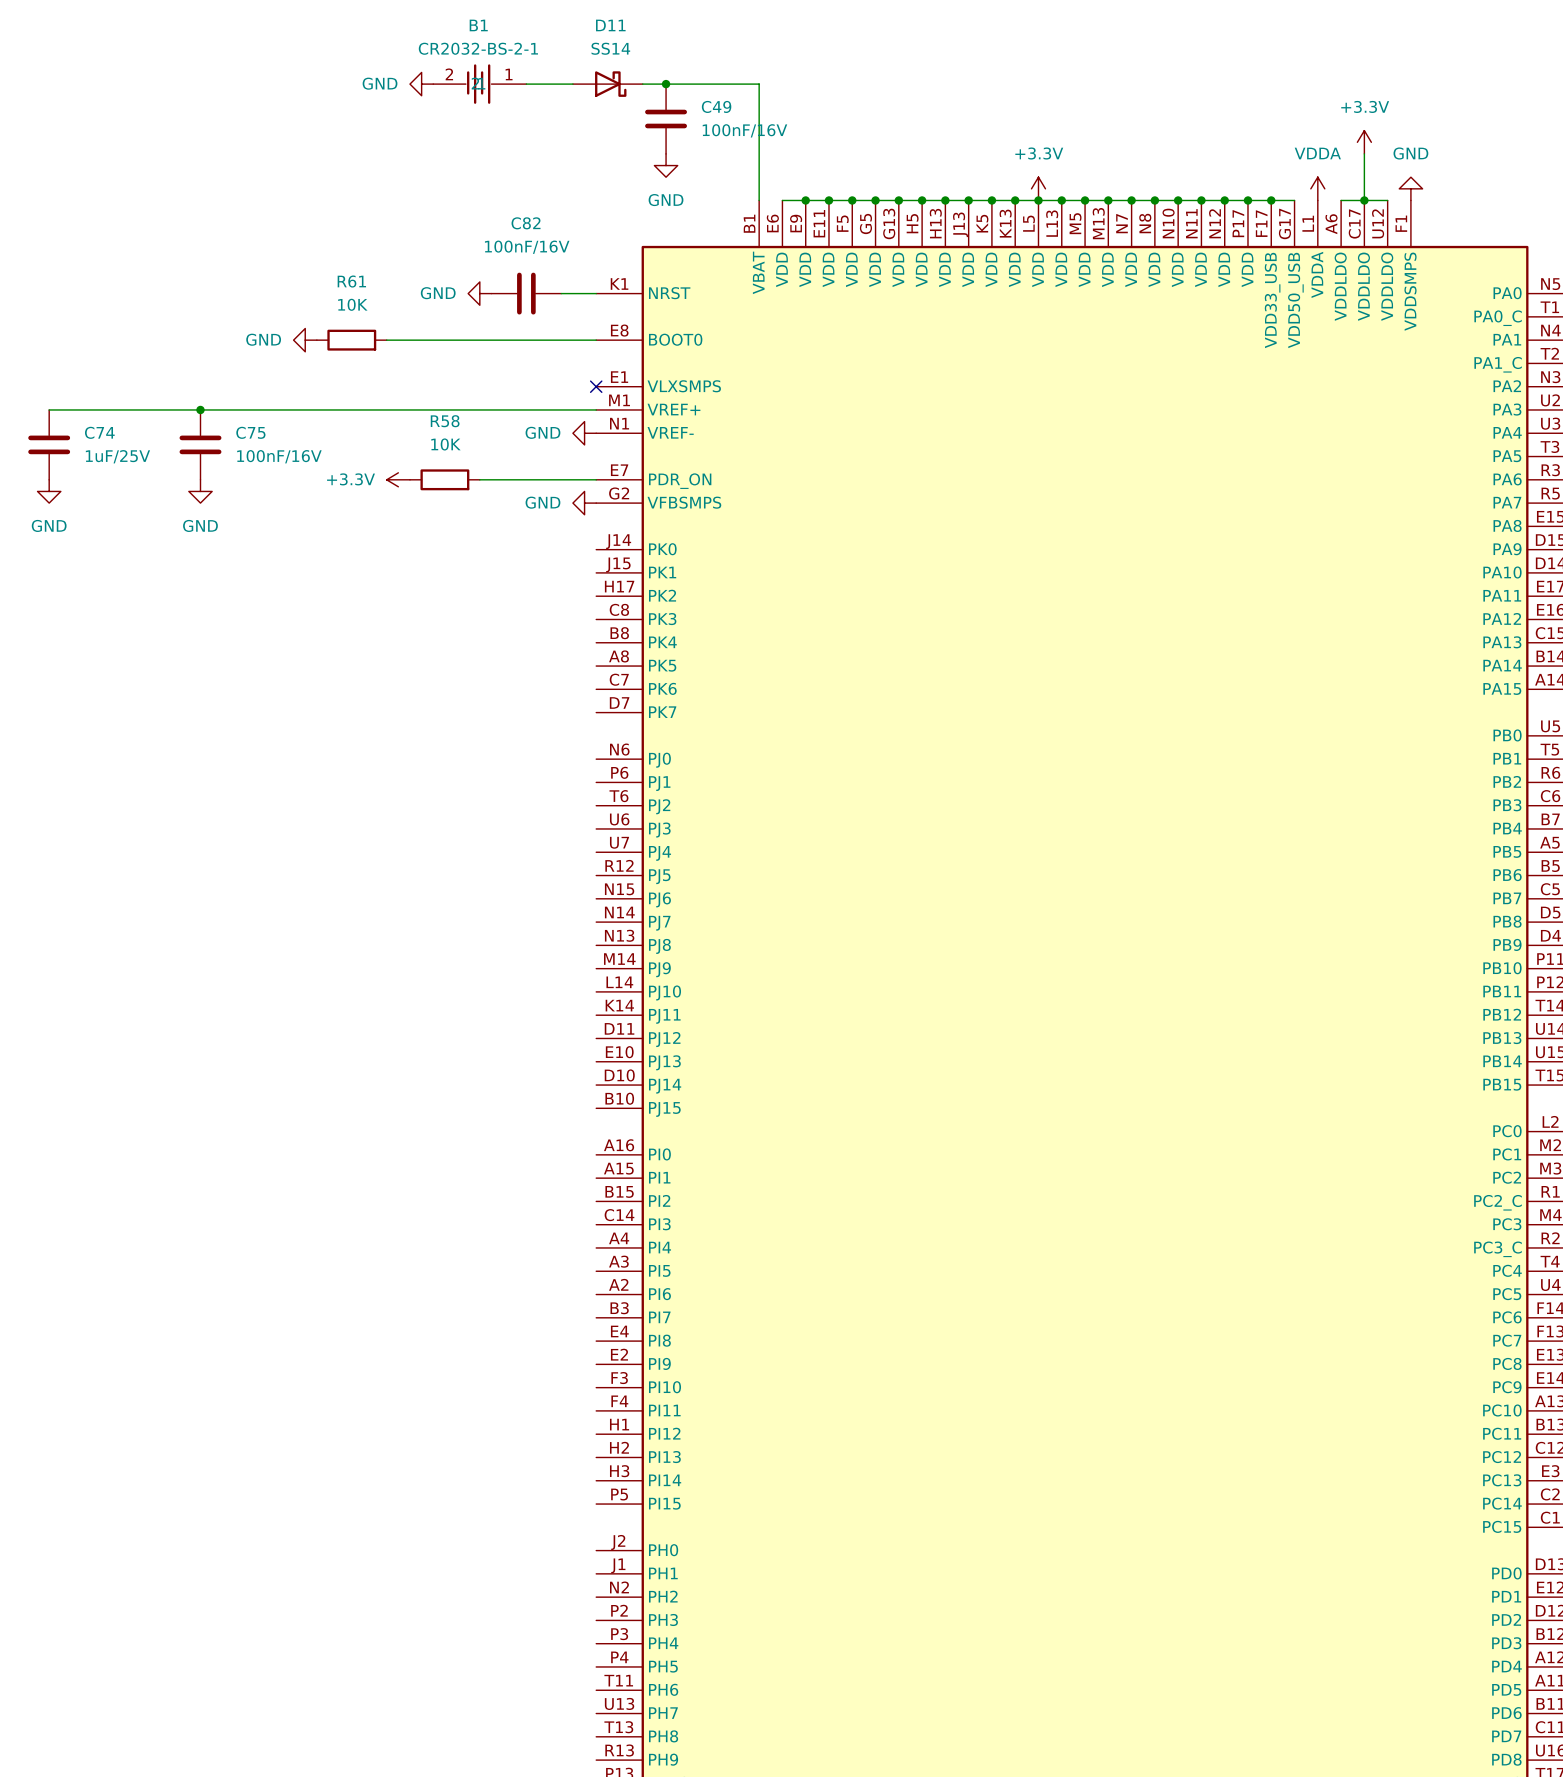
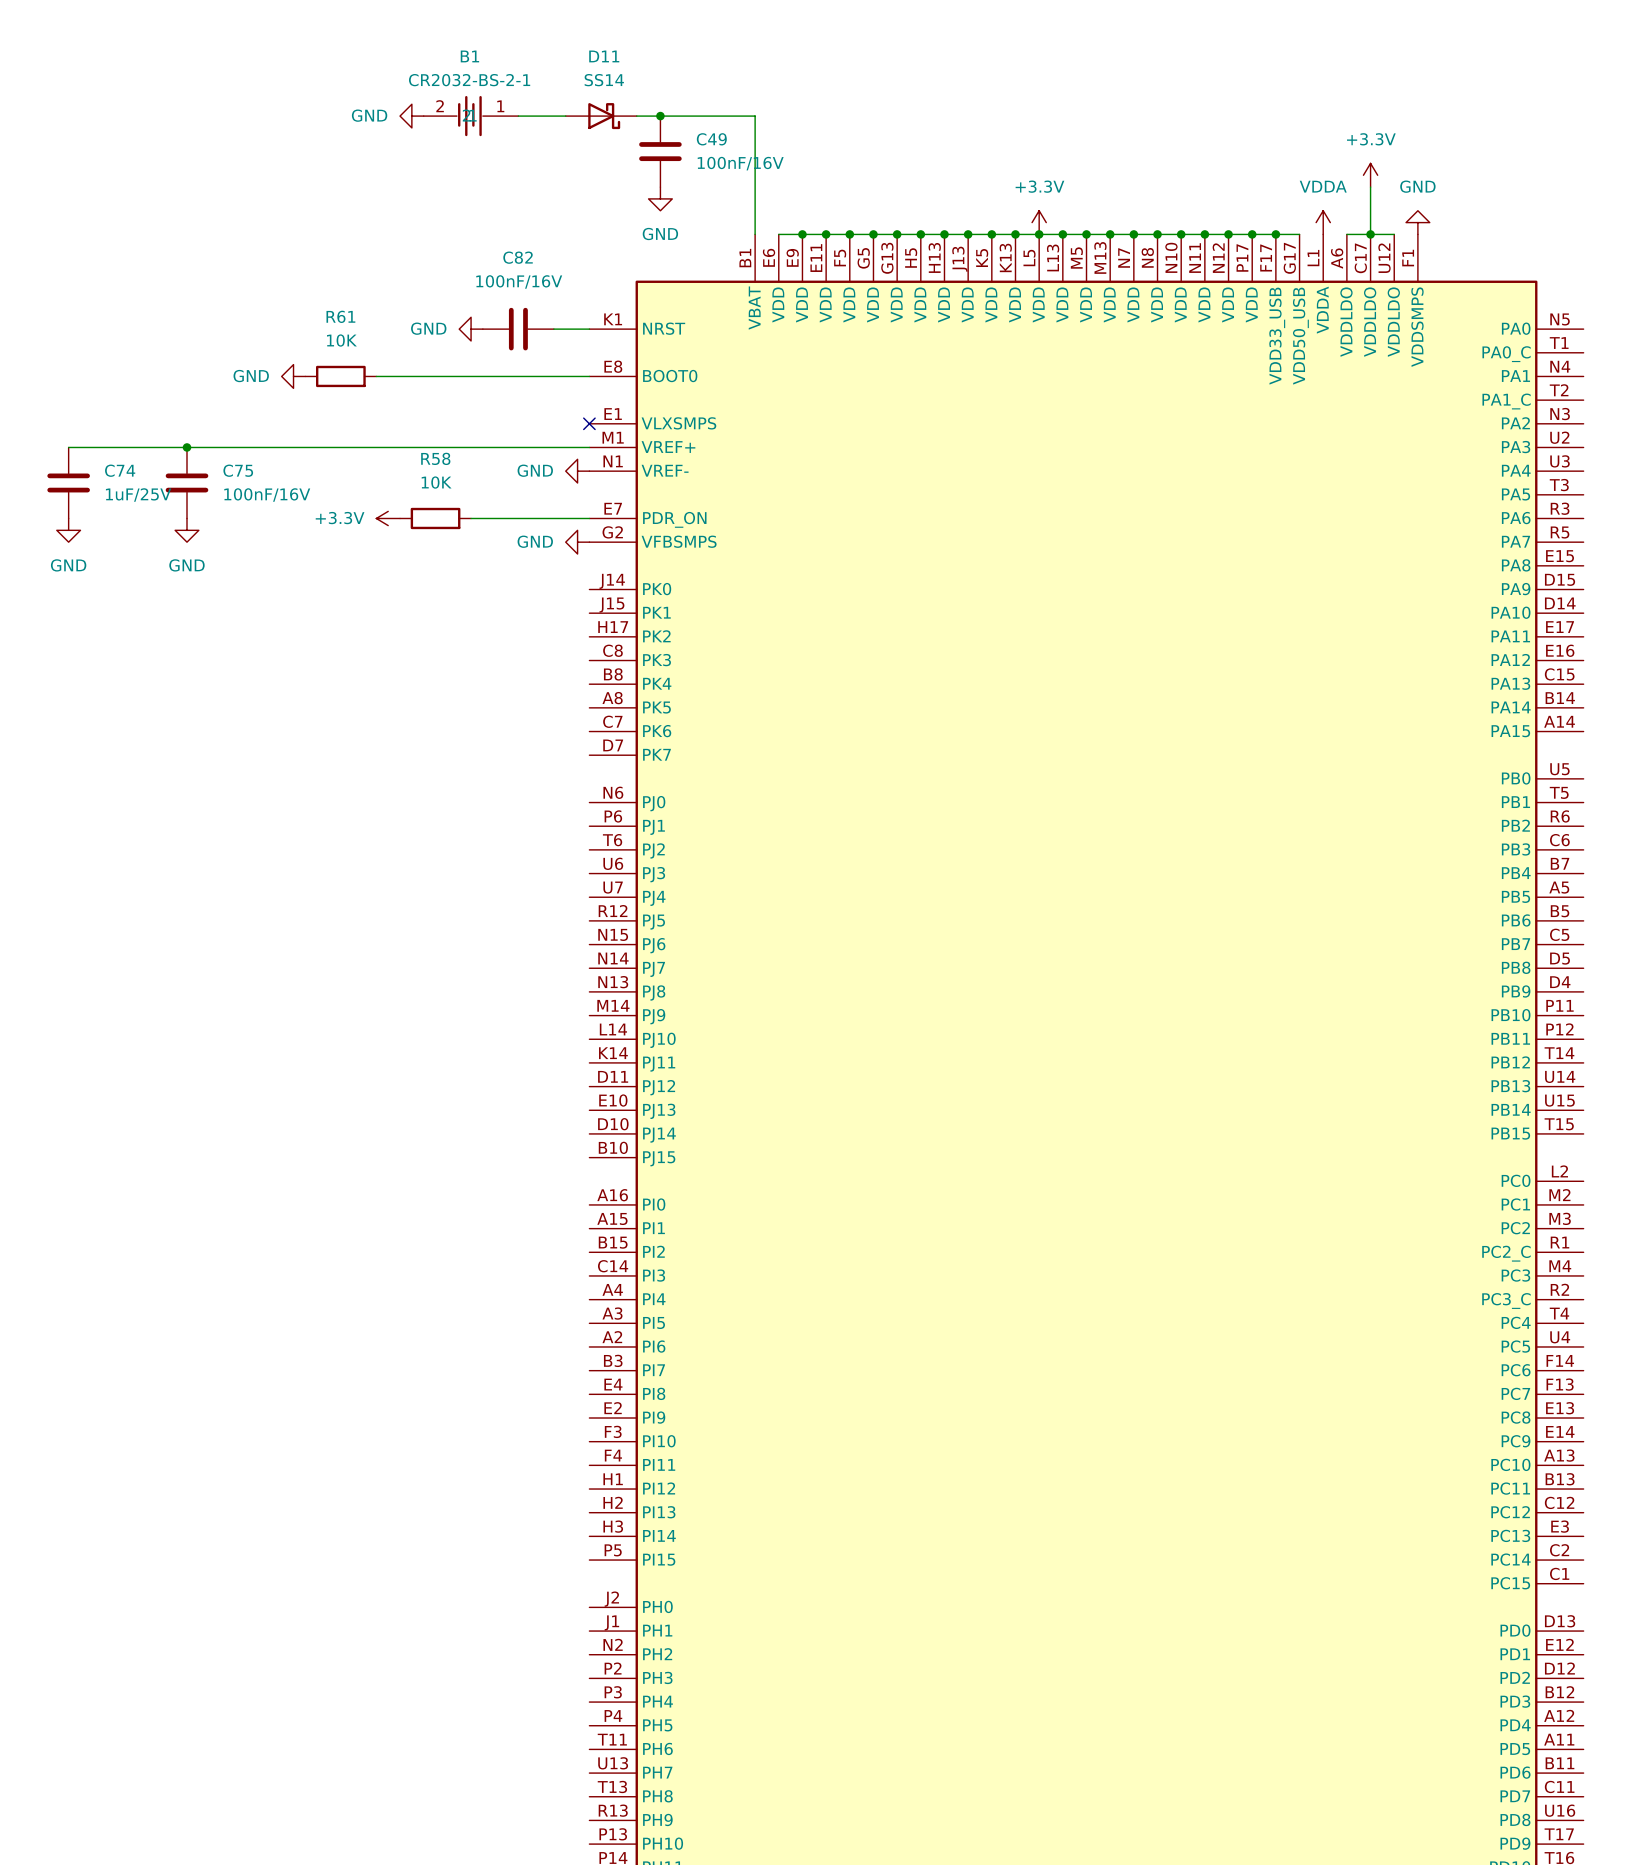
wire: (49, 409) (84, 409) -> none
C74 position: (49, 444) -> (68, 482)
power symbol position: GND (49, 491) -> GND (68, 530)

